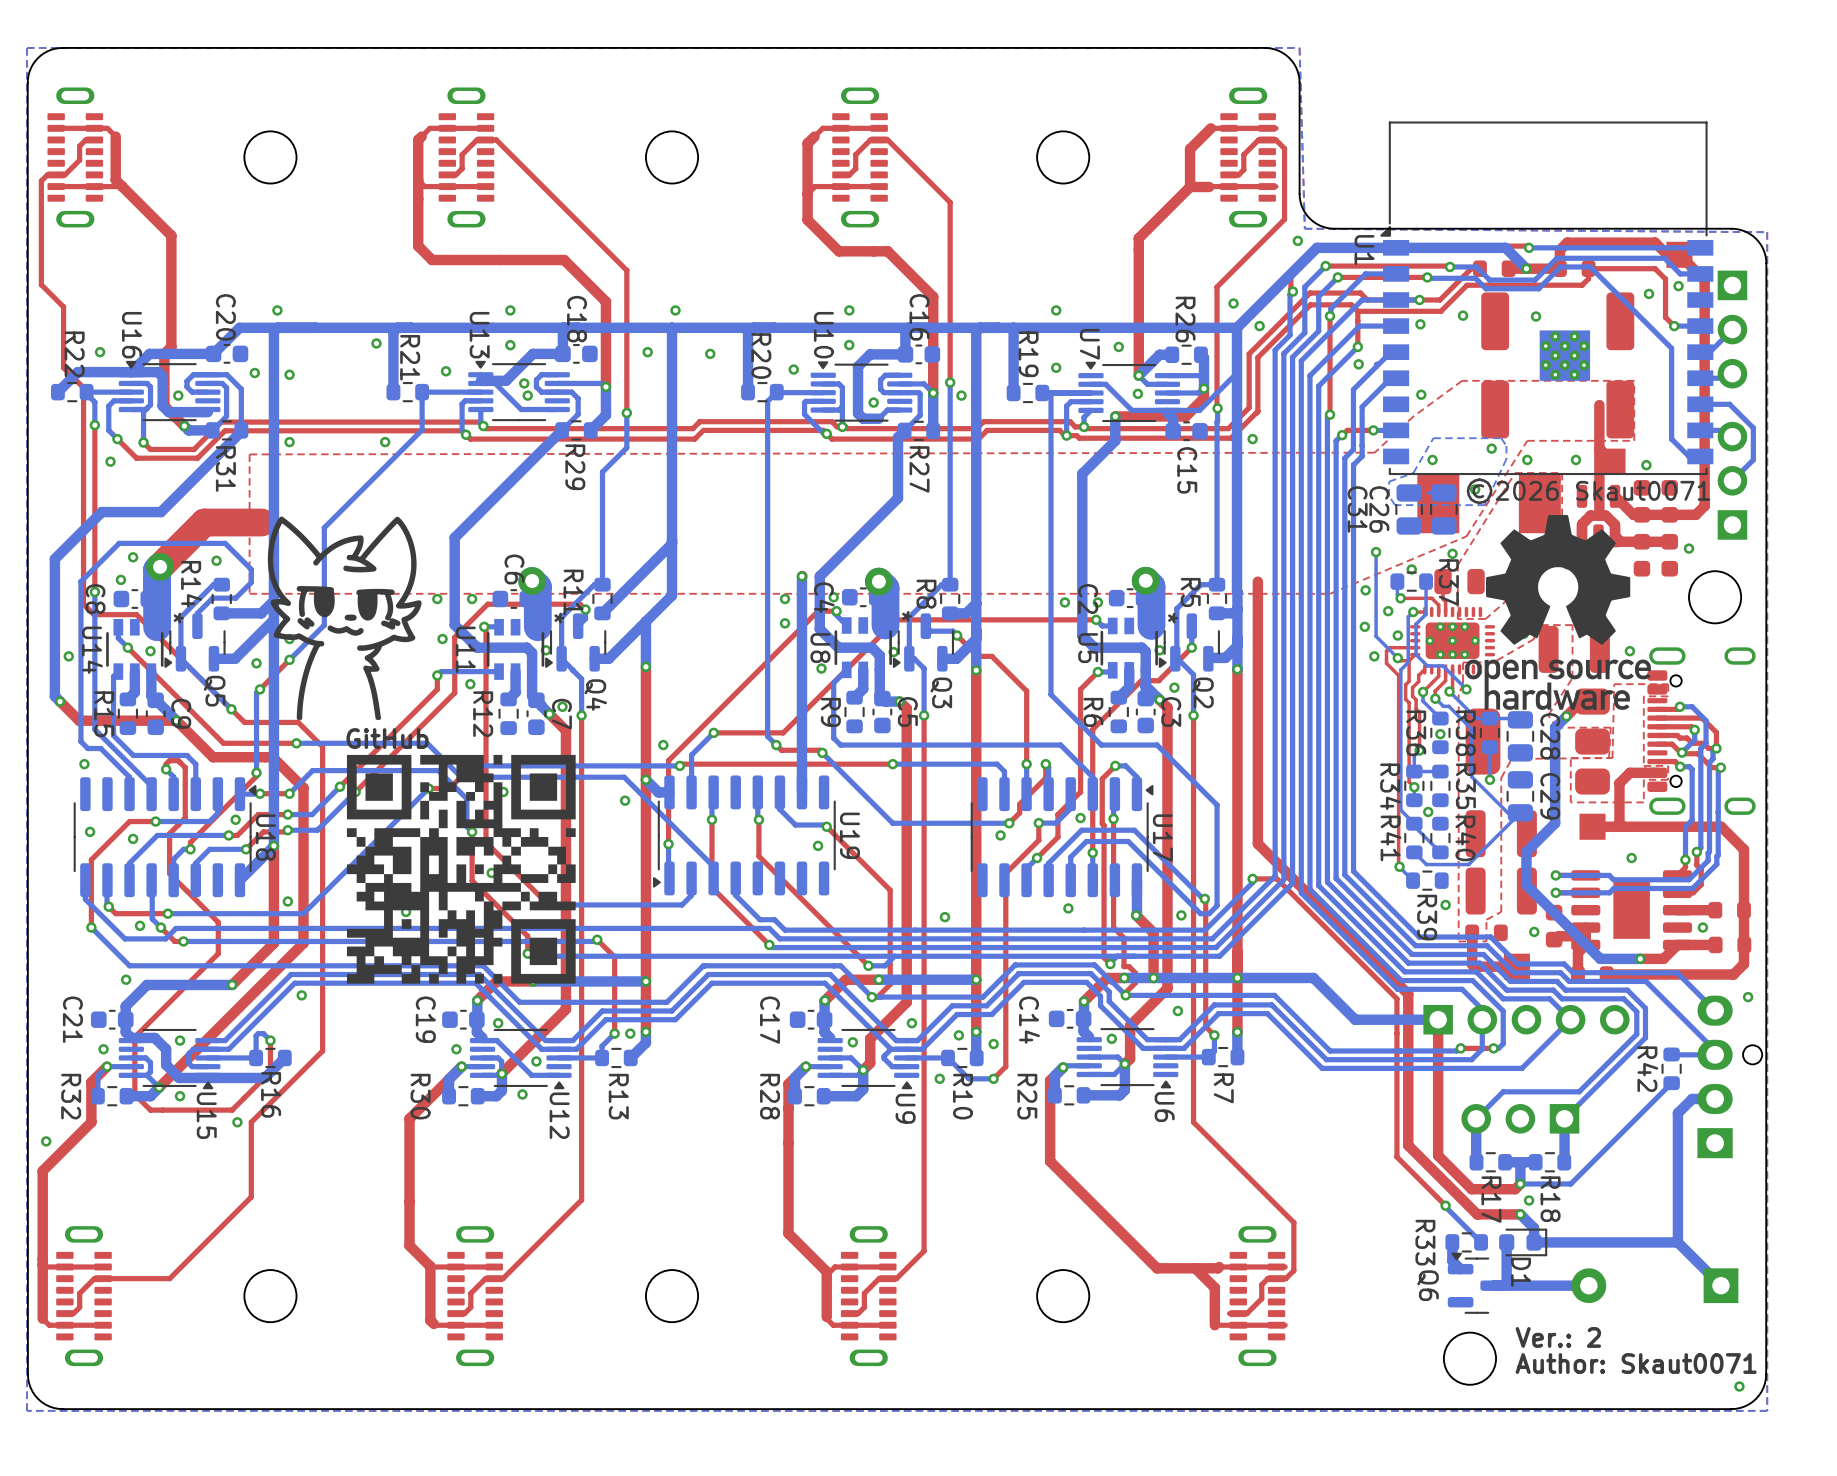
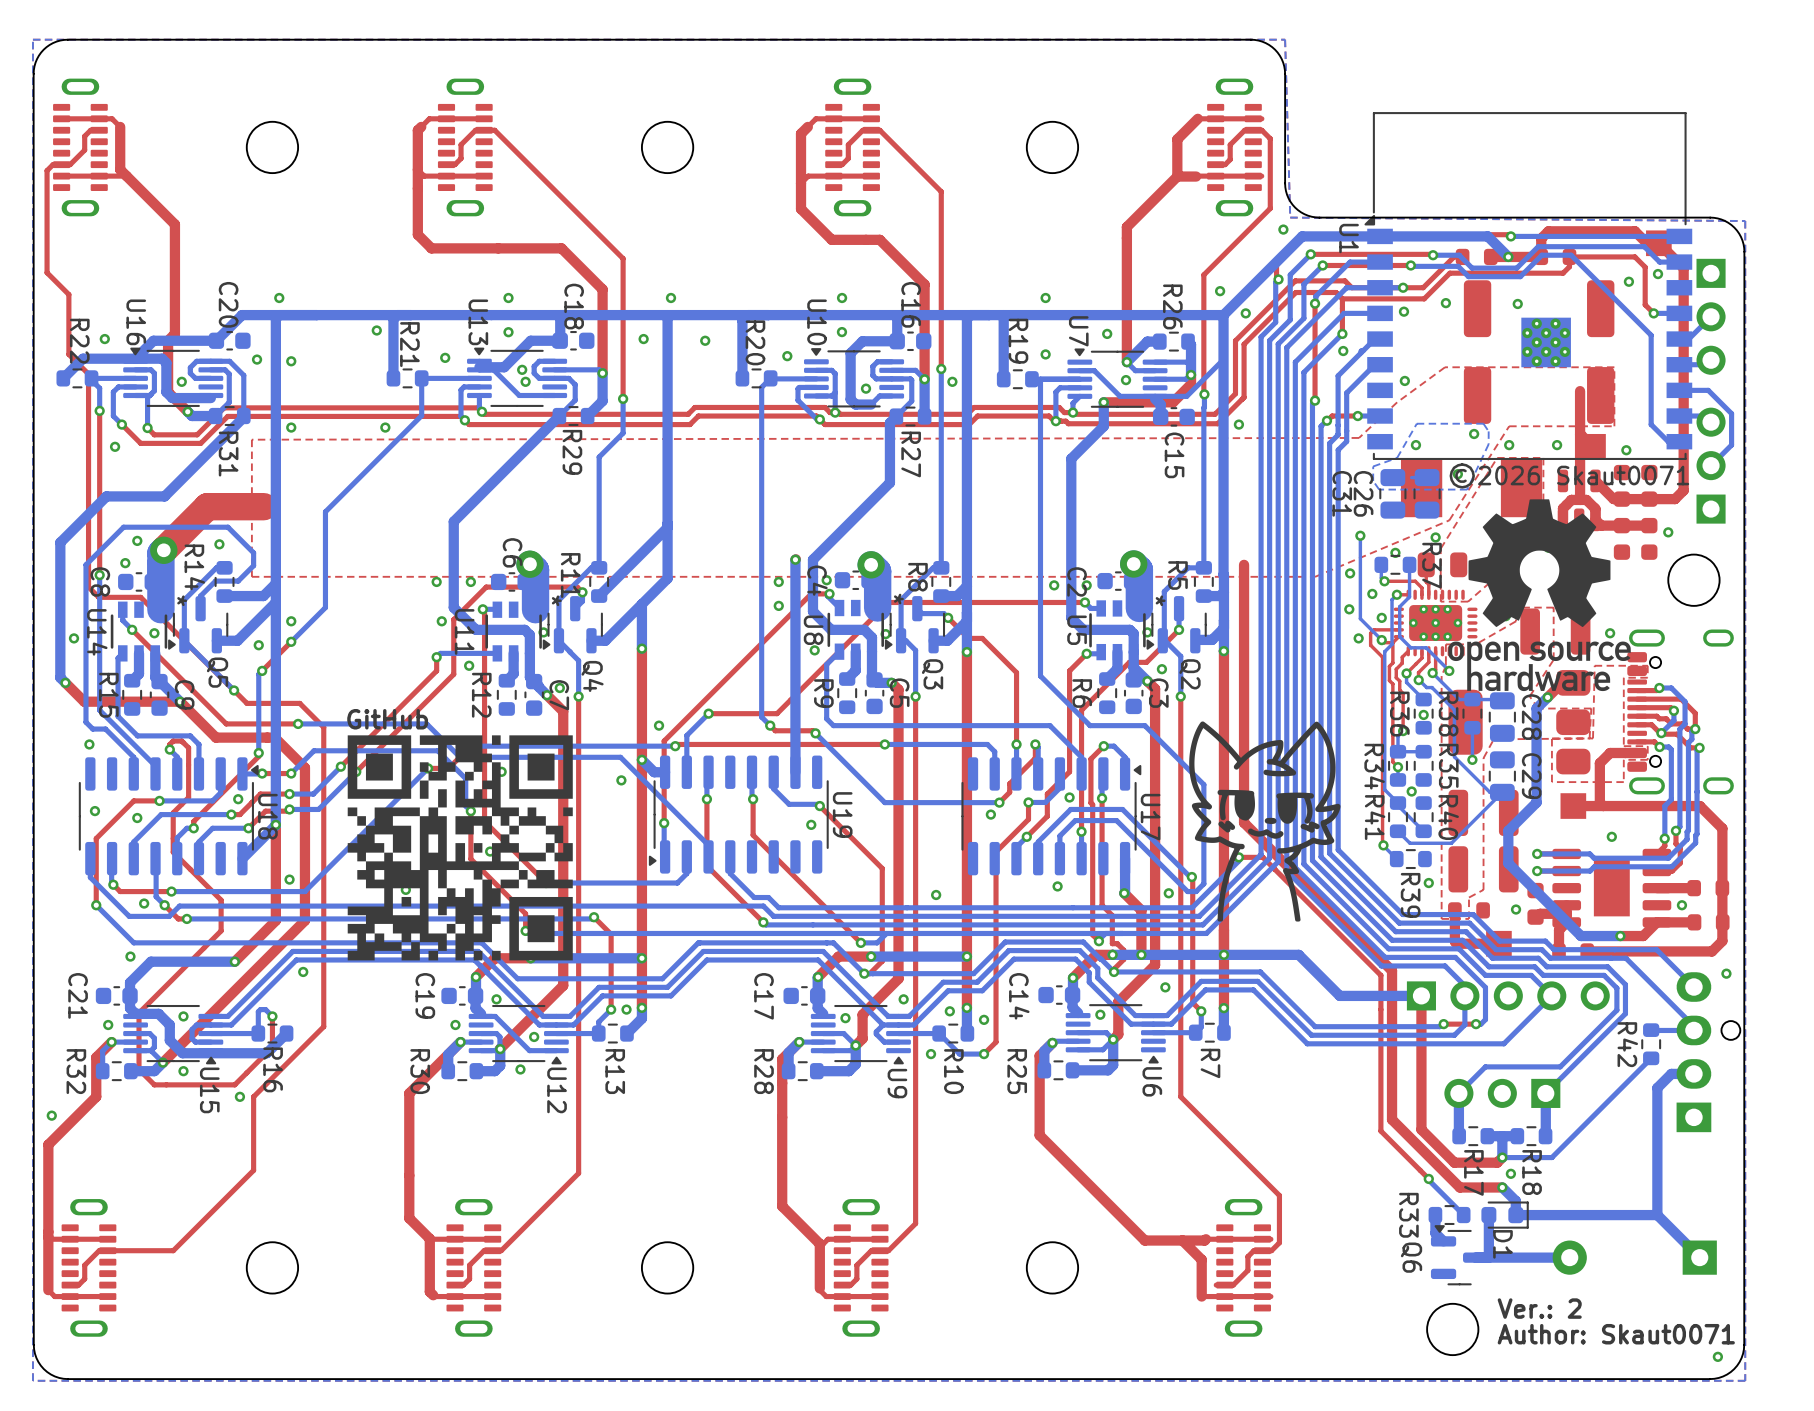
drawing: [267, 516, 422, 720] -> none
drawing: none -> [1189, 721, 1341, 922]

